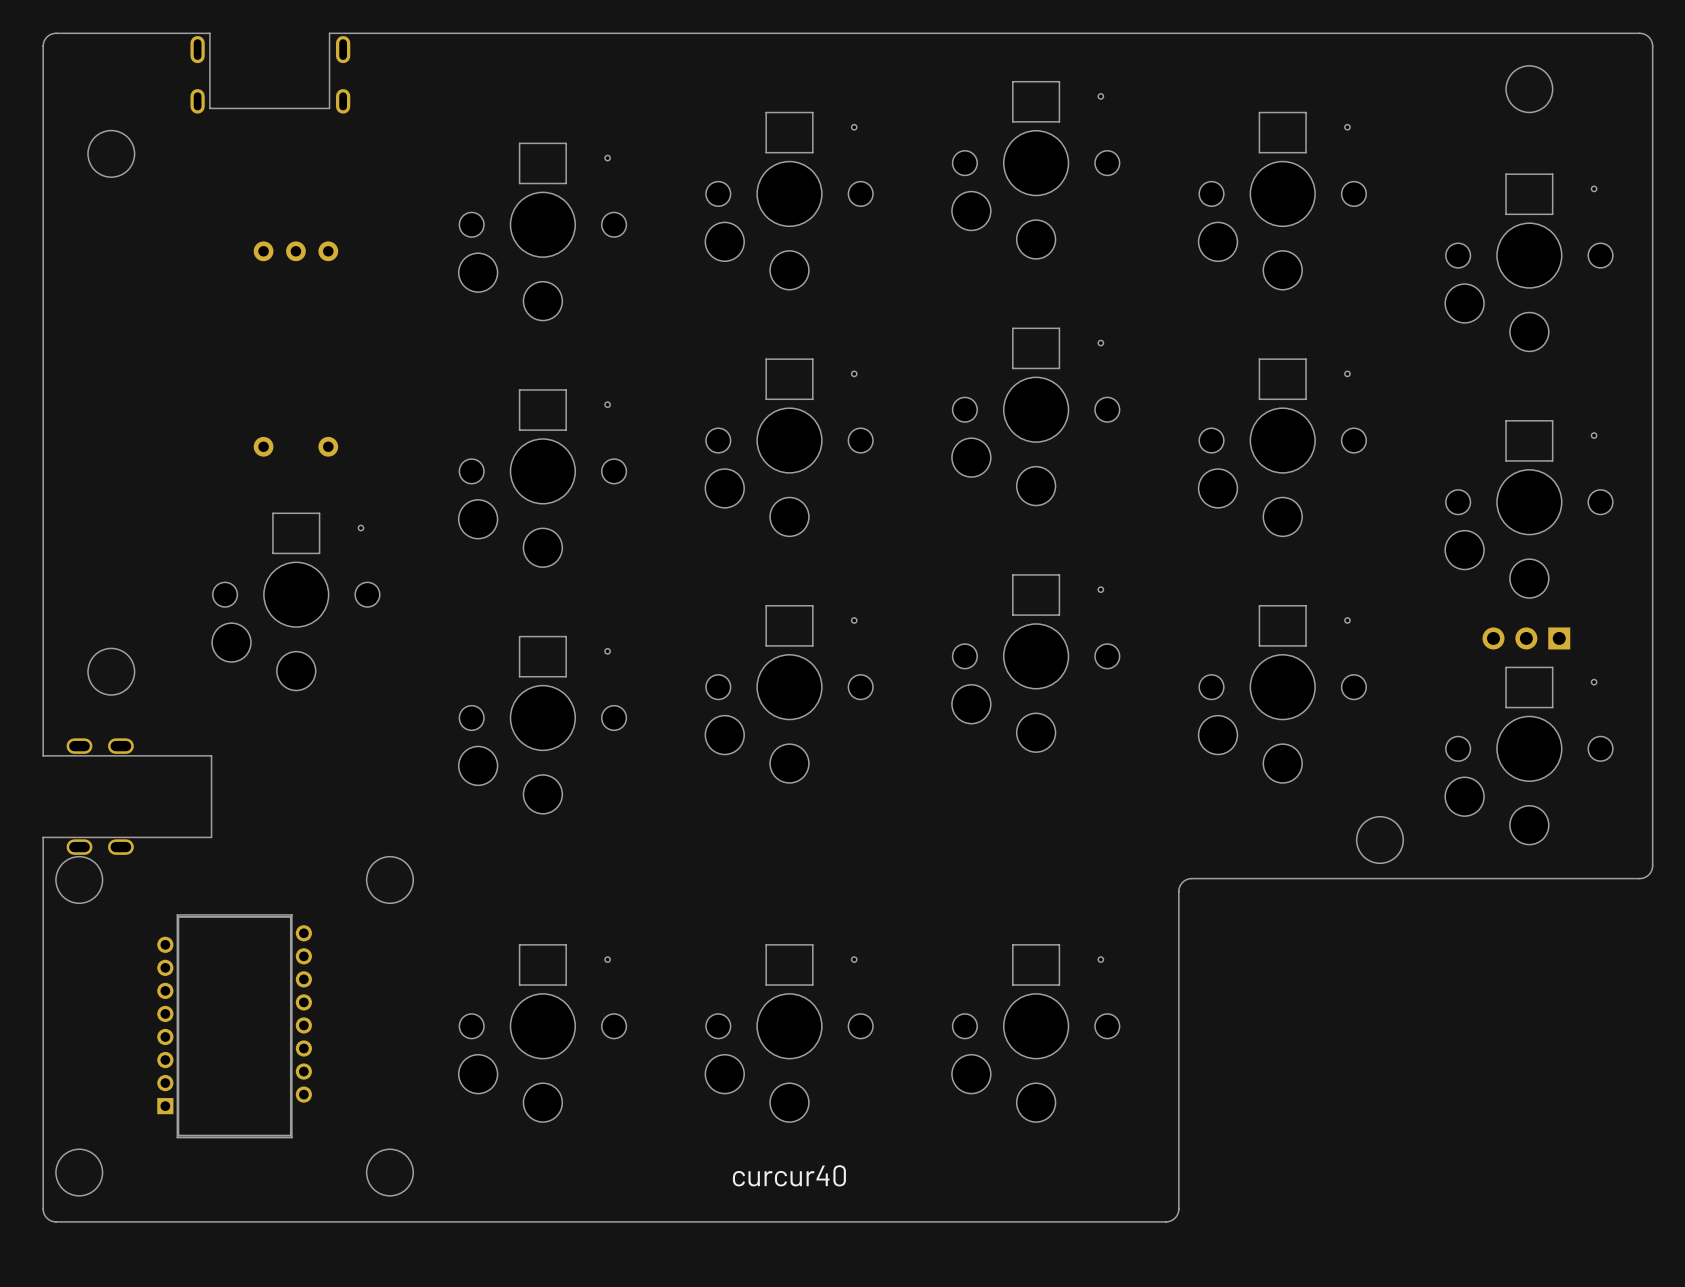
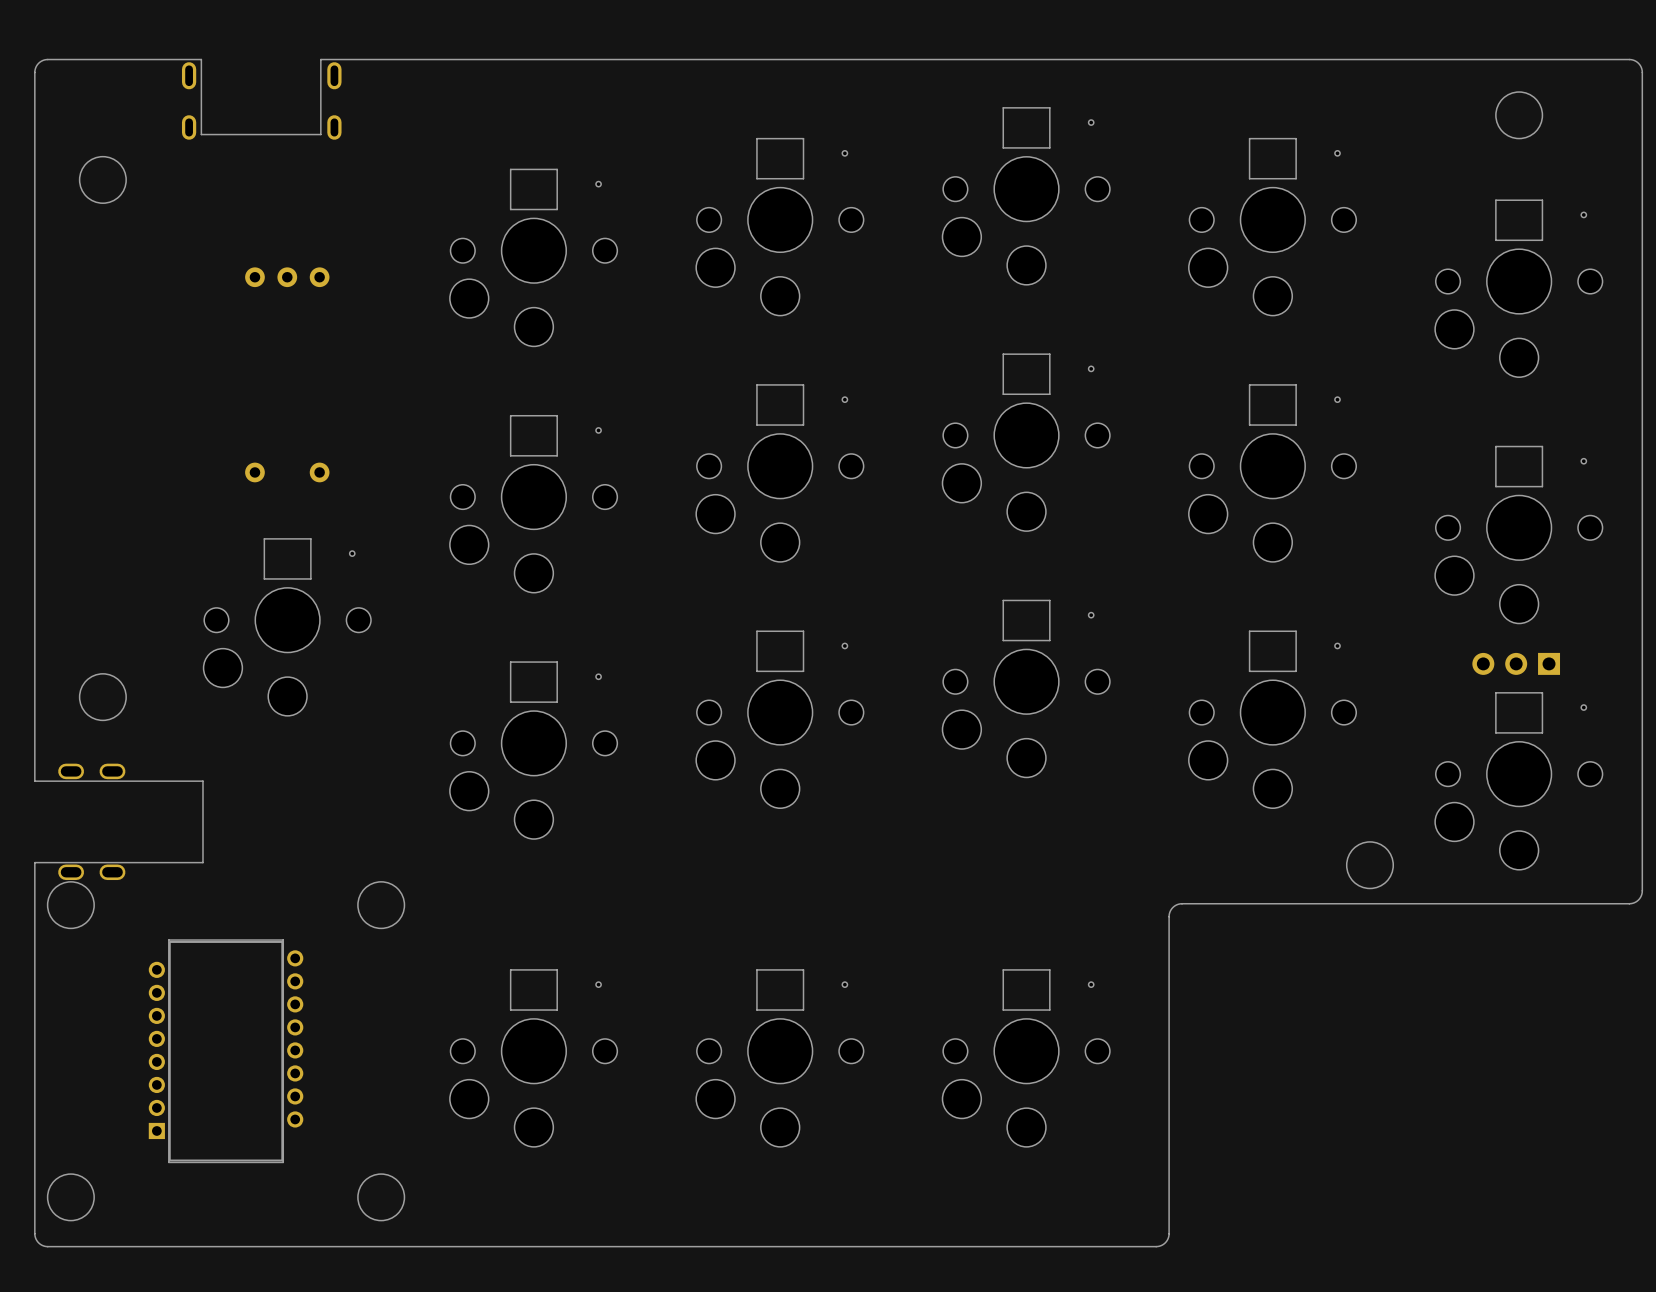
text: curcur40 (789, 1175) -> none

